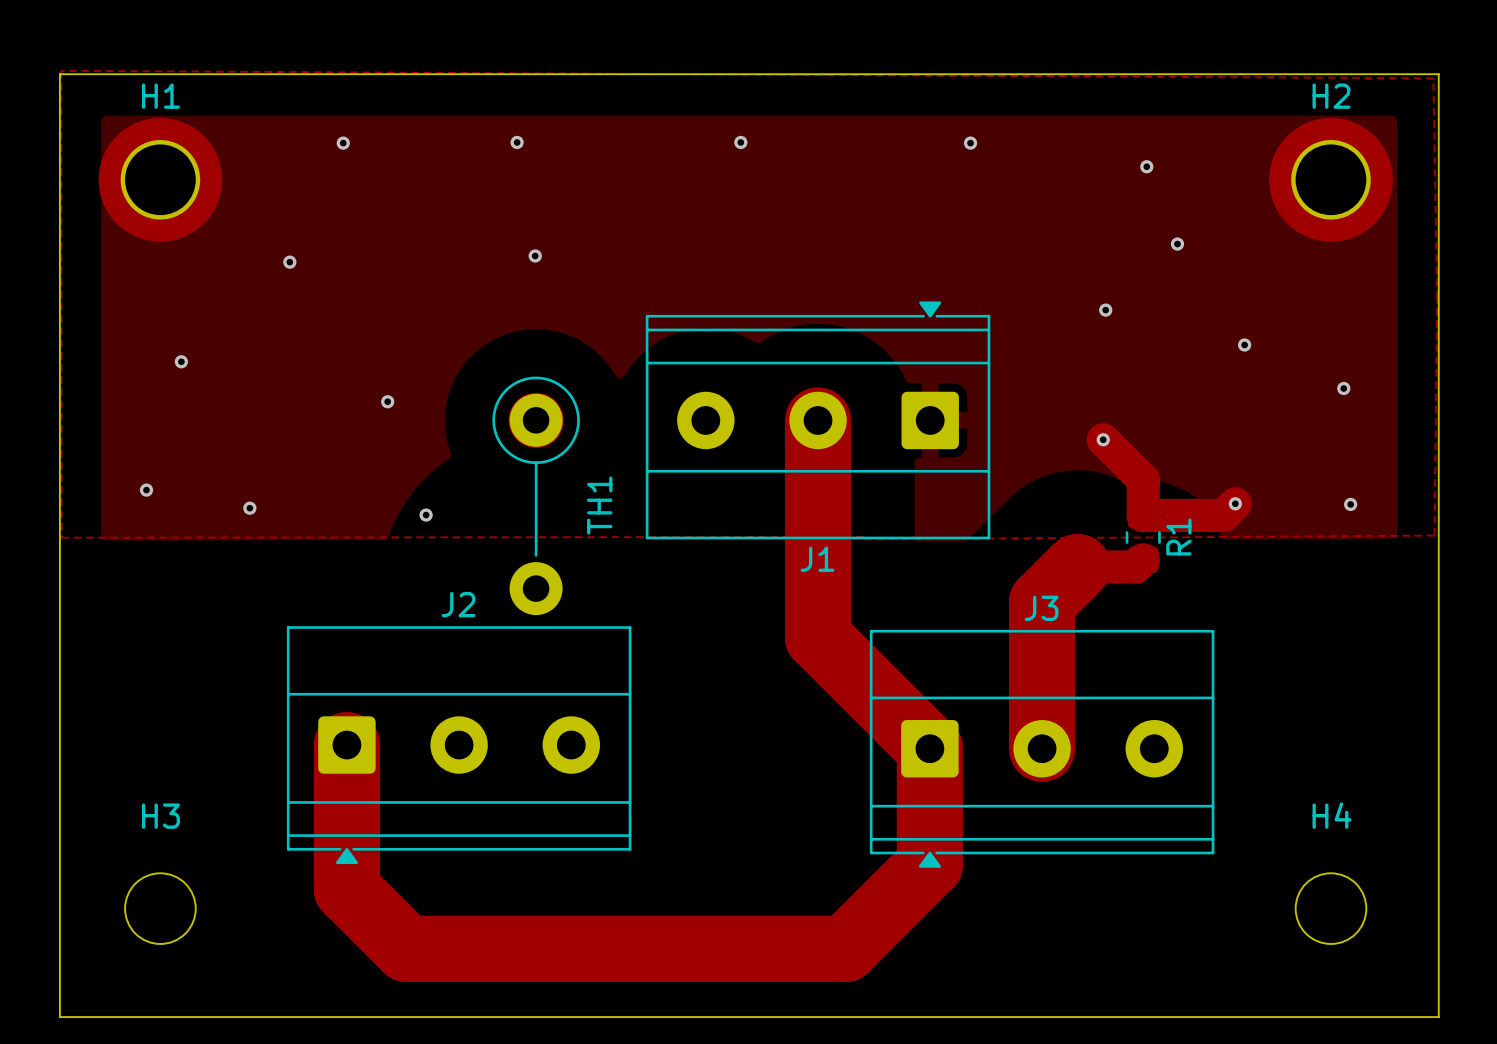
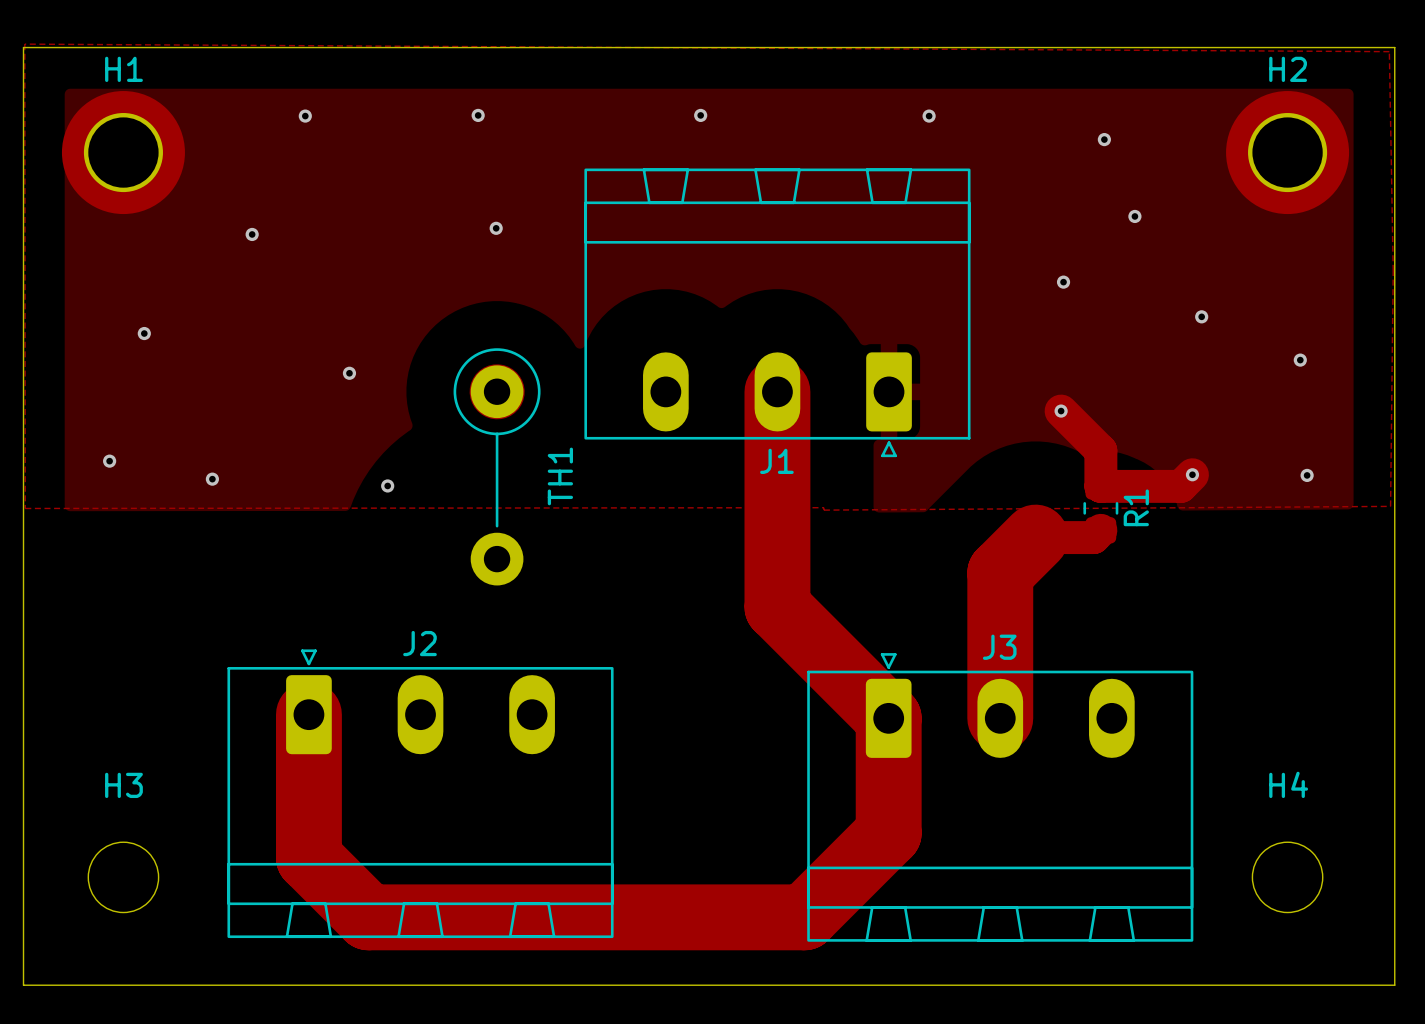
J1 footprint: [645, 301, 991, 540] -> [584, 168, 971, 458]
J2 footprint: [286, 626, 632, 865] -> [227, 649, 614, 939]
J3 footprint: [869, 629, 1215, 868] -> [807, 653, 1194, 942]

